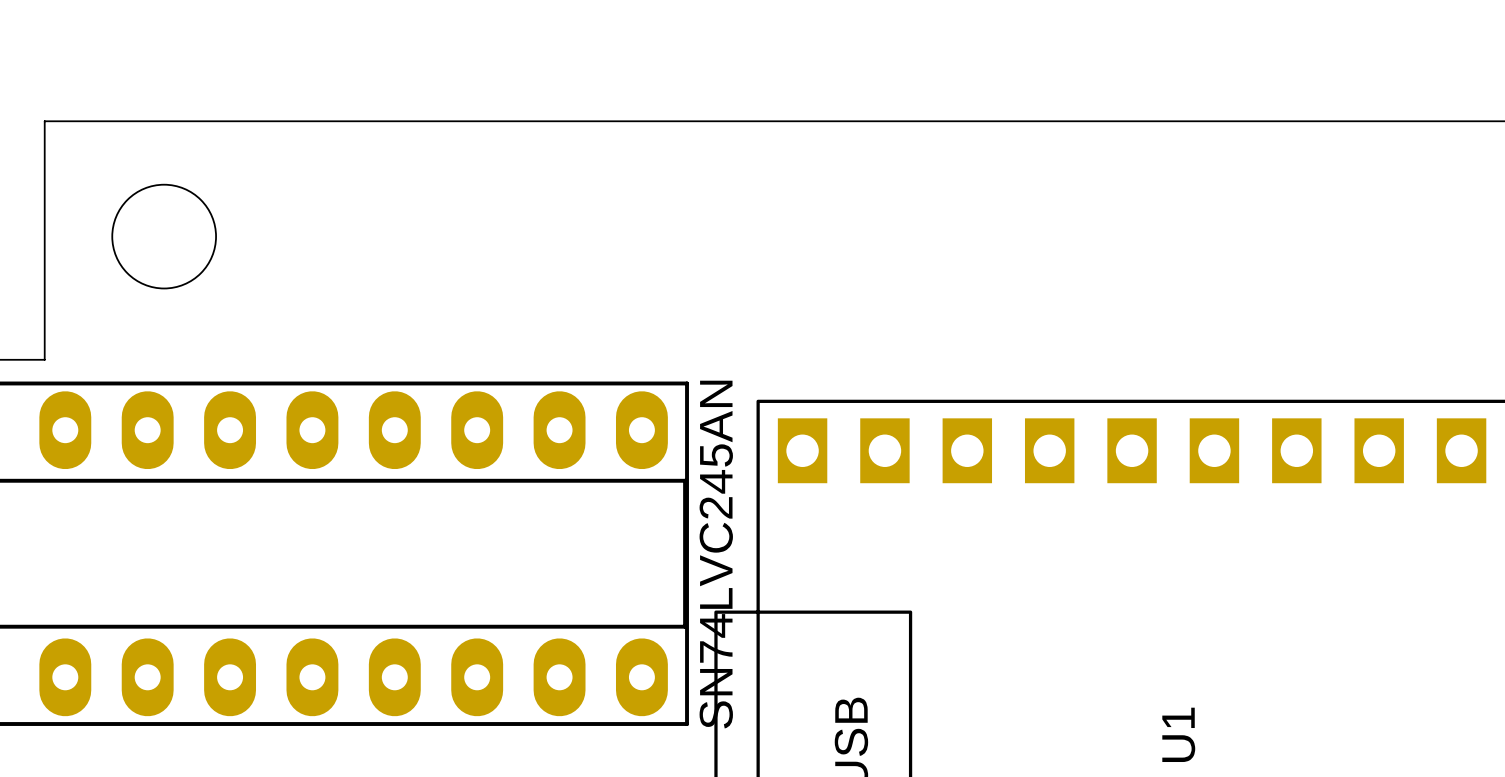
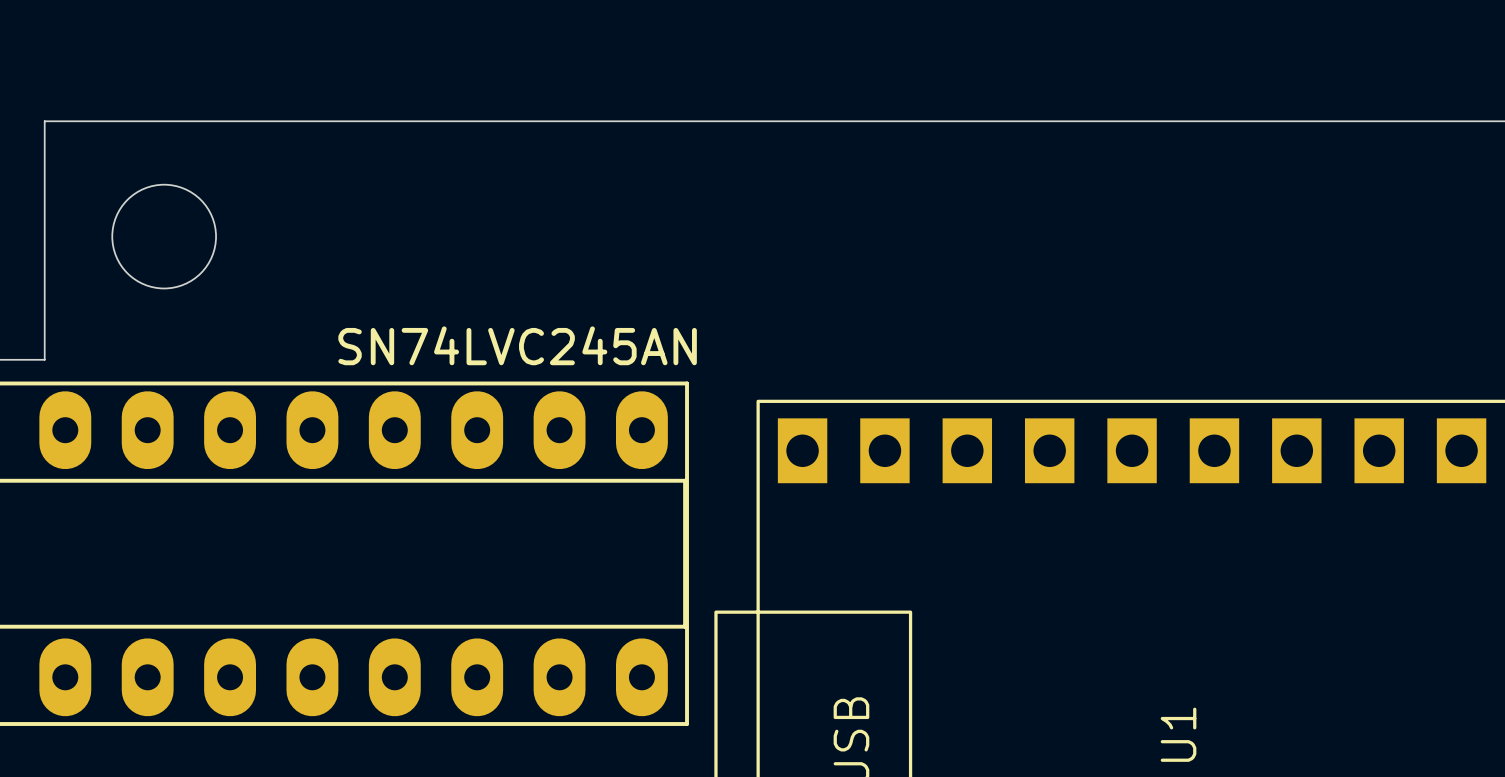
part value rotation: 0° (716, 554) -> 90° clockwise (517, 345)

